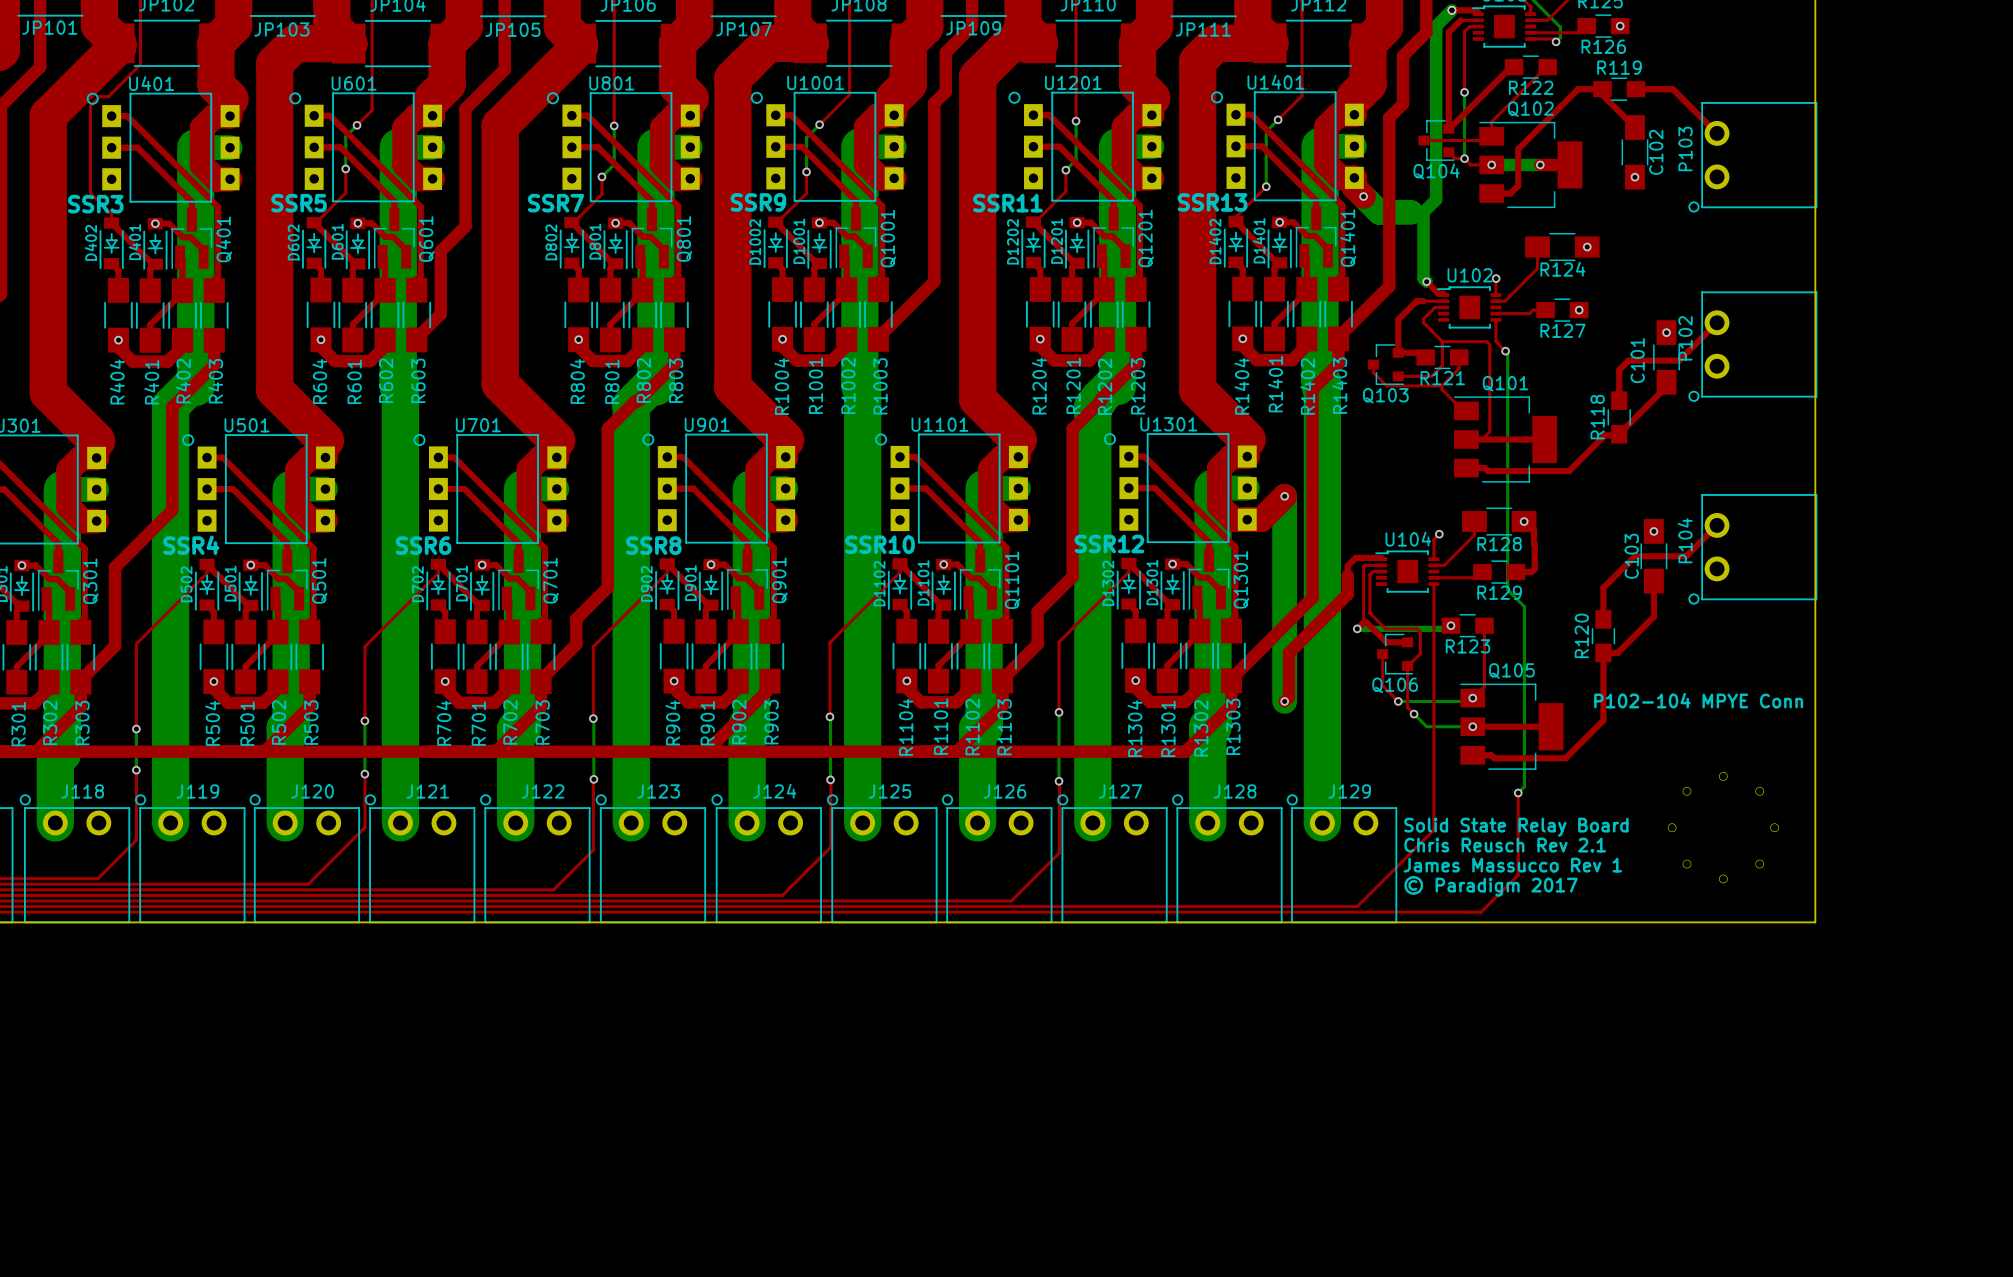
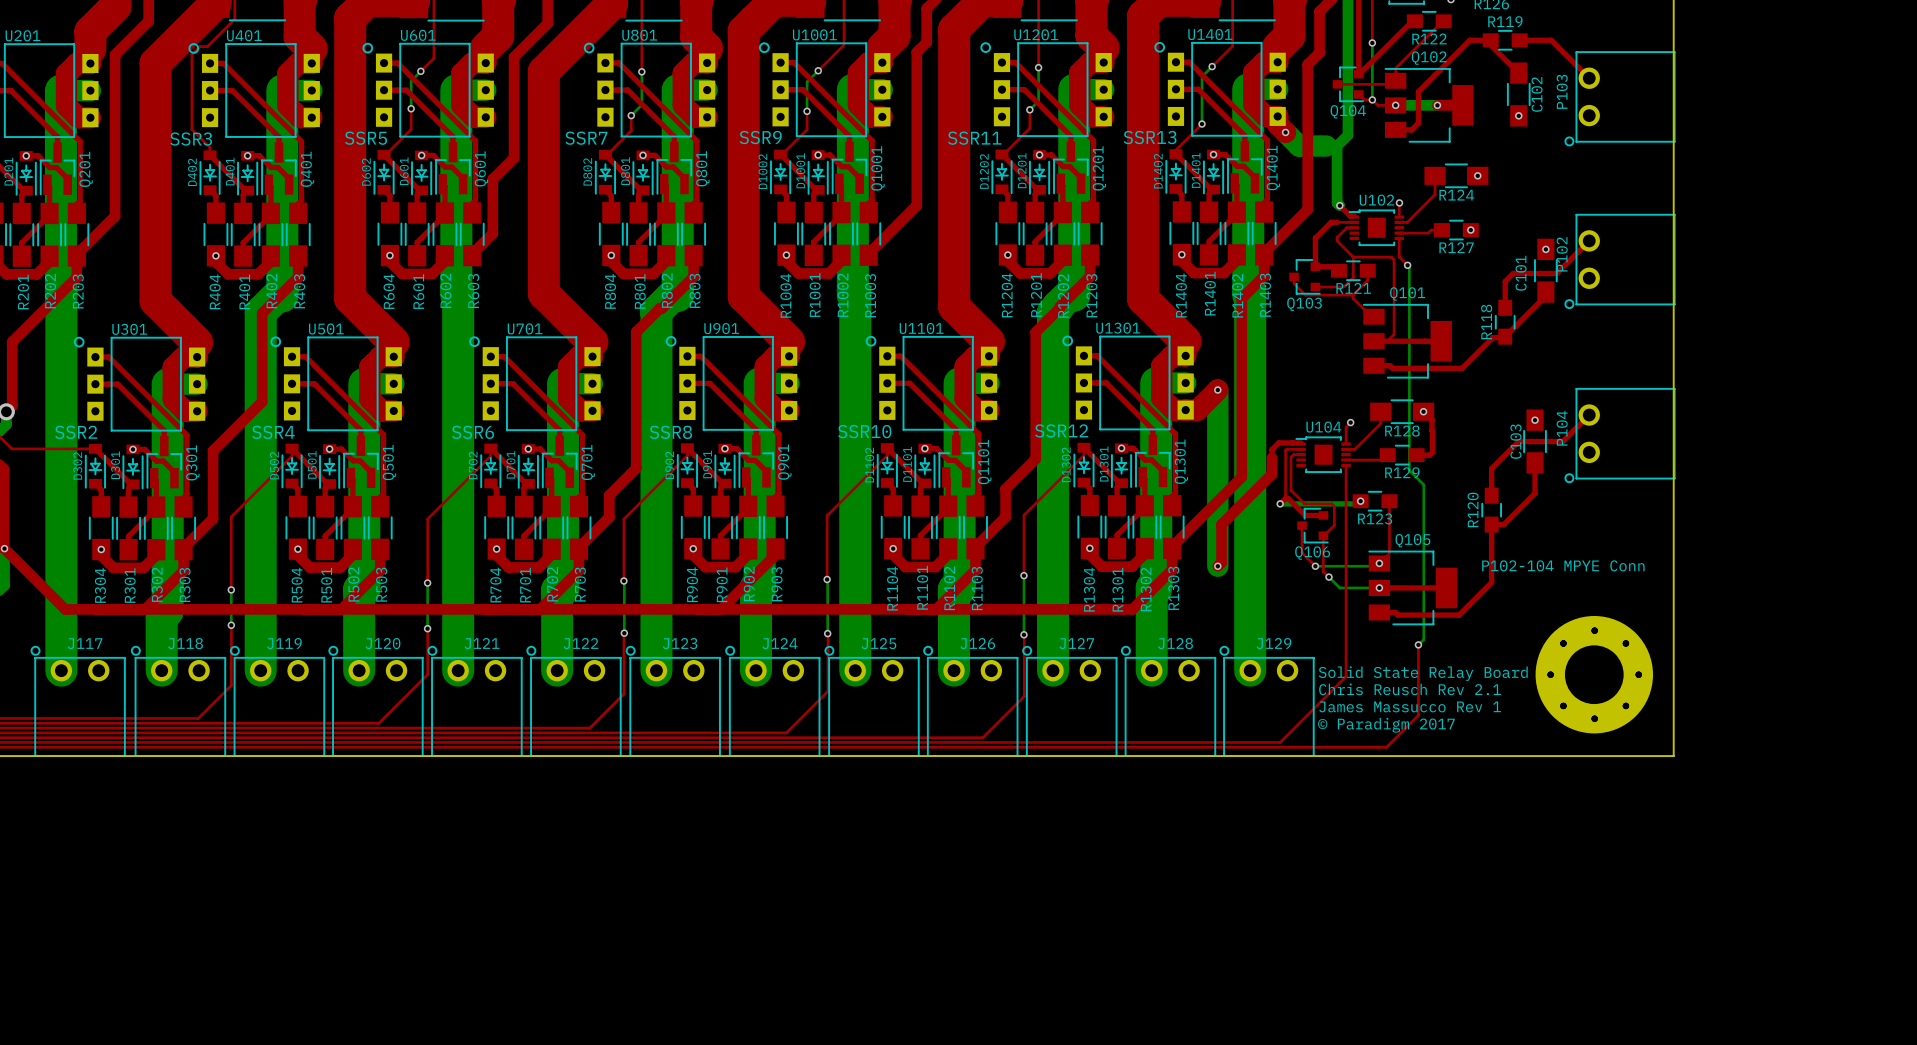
part: none -> (1594, 674)

